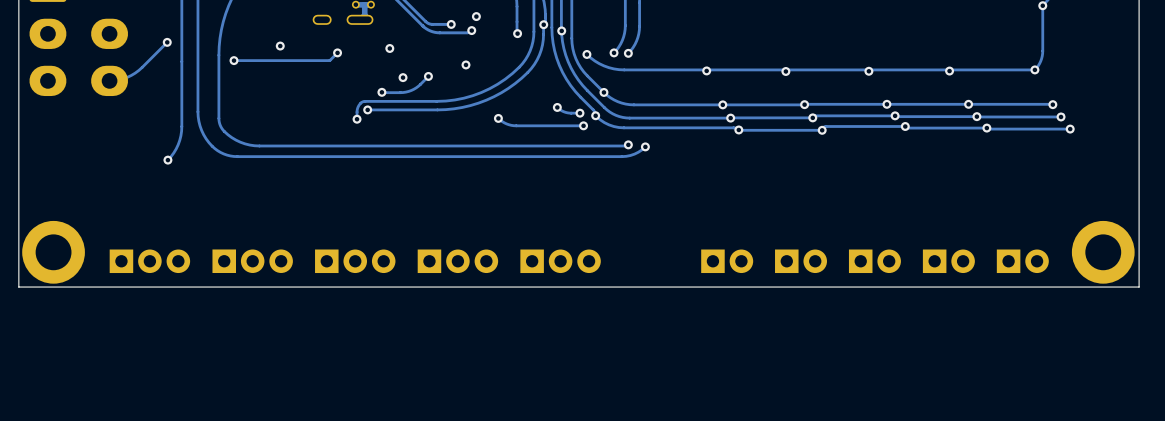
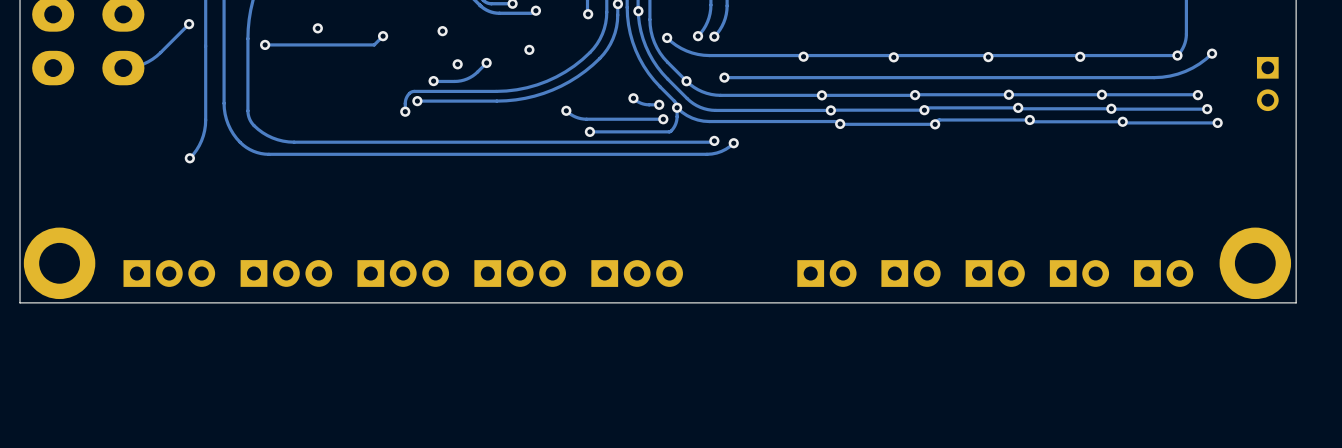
track: none -> (1212, 53) (1192, 67) (1177, 74) (1162, 77) (724, 77)
via: none -> (1212, 53)
via: none -> (724, 77)
part: none -> (1267, 84)
track: none -> (677, 107) (676, 122) (669, 131) (589, 131)
via: none -> (589, 131)

